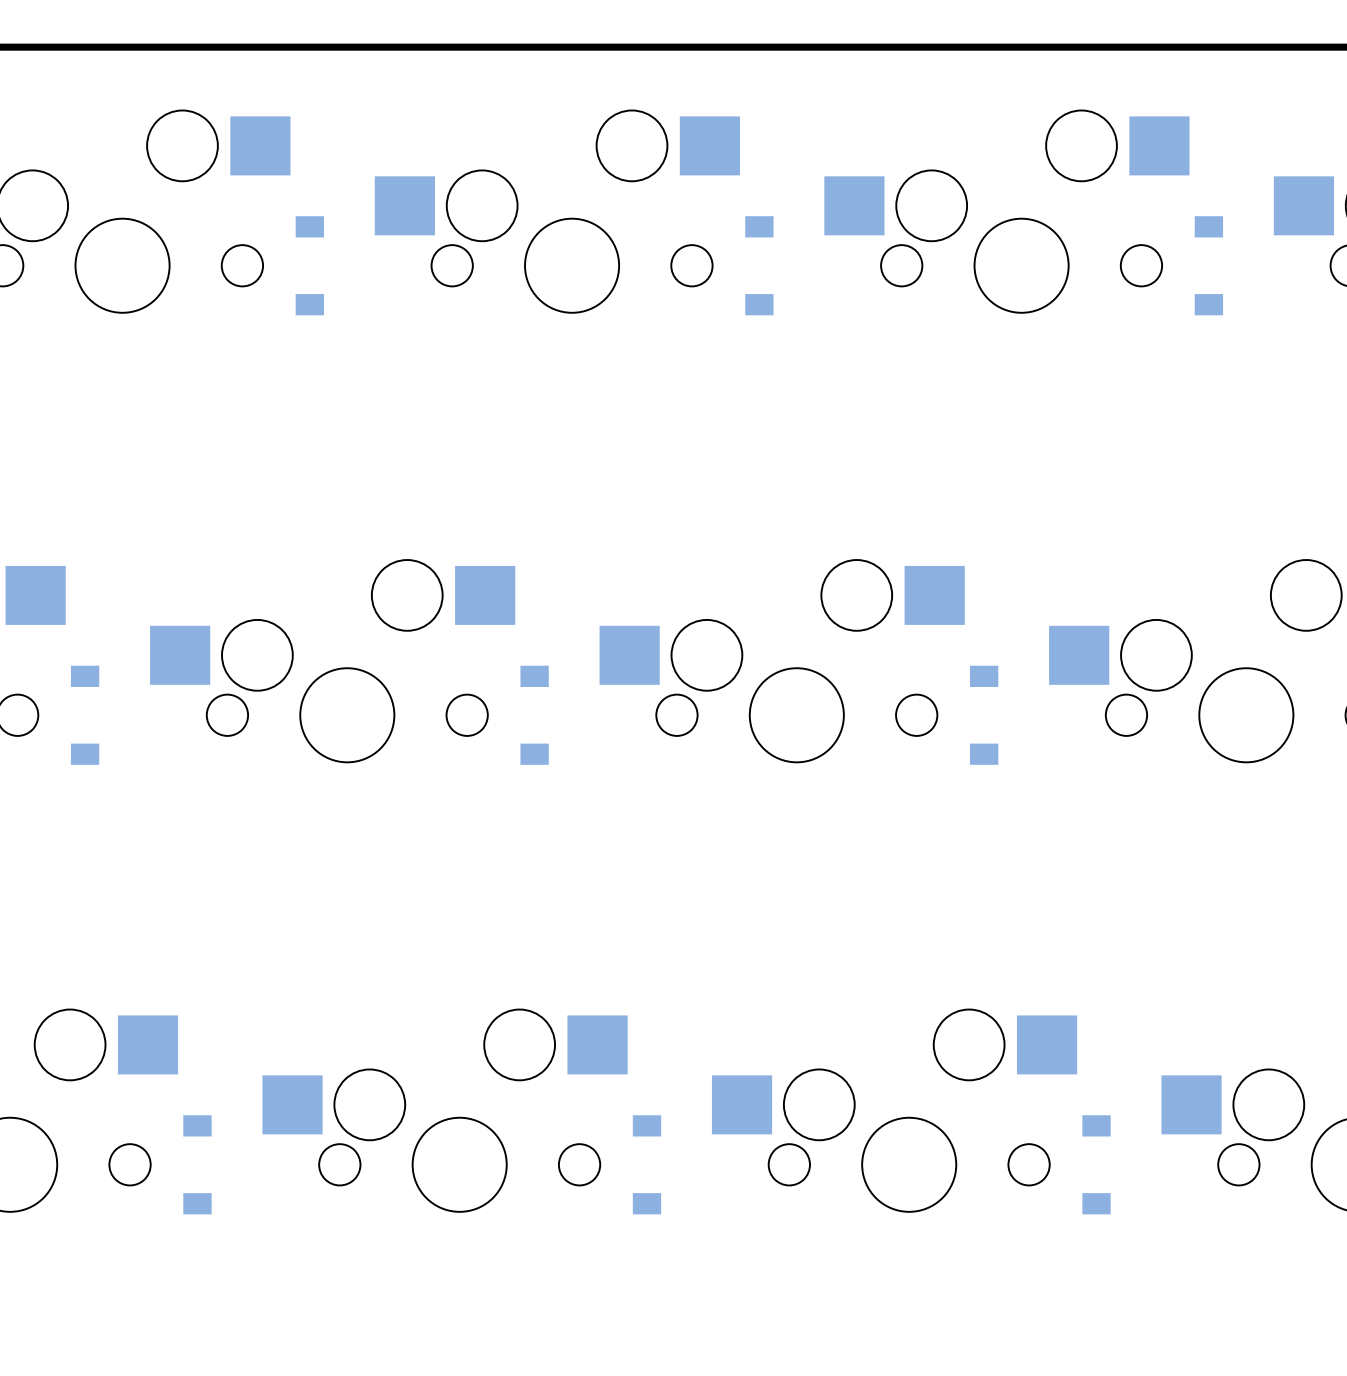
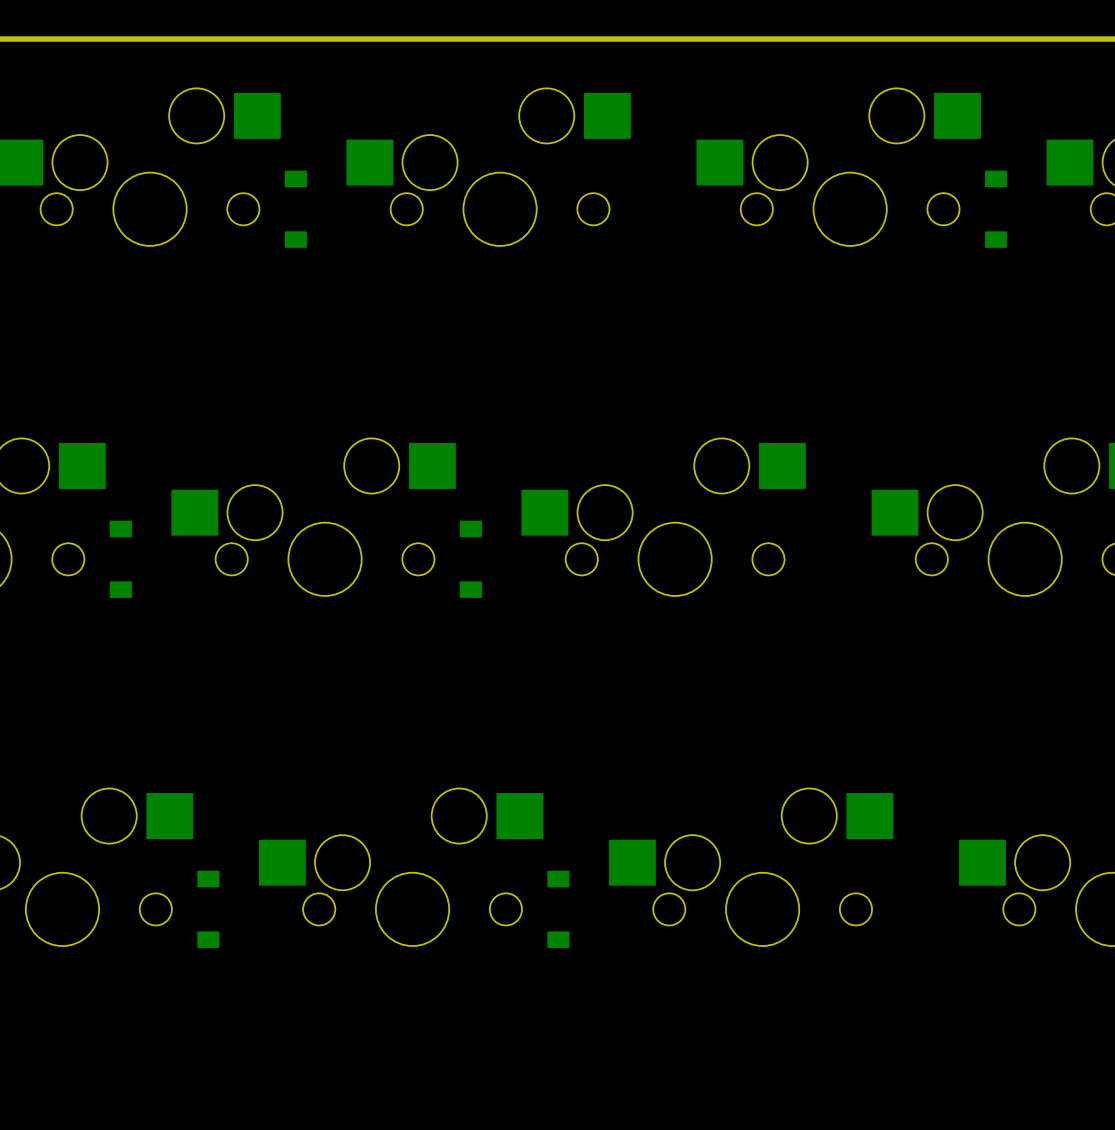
part: (759, 265) -> none
part: (984, 715) -> none
part: (1096, 1164) -> none

